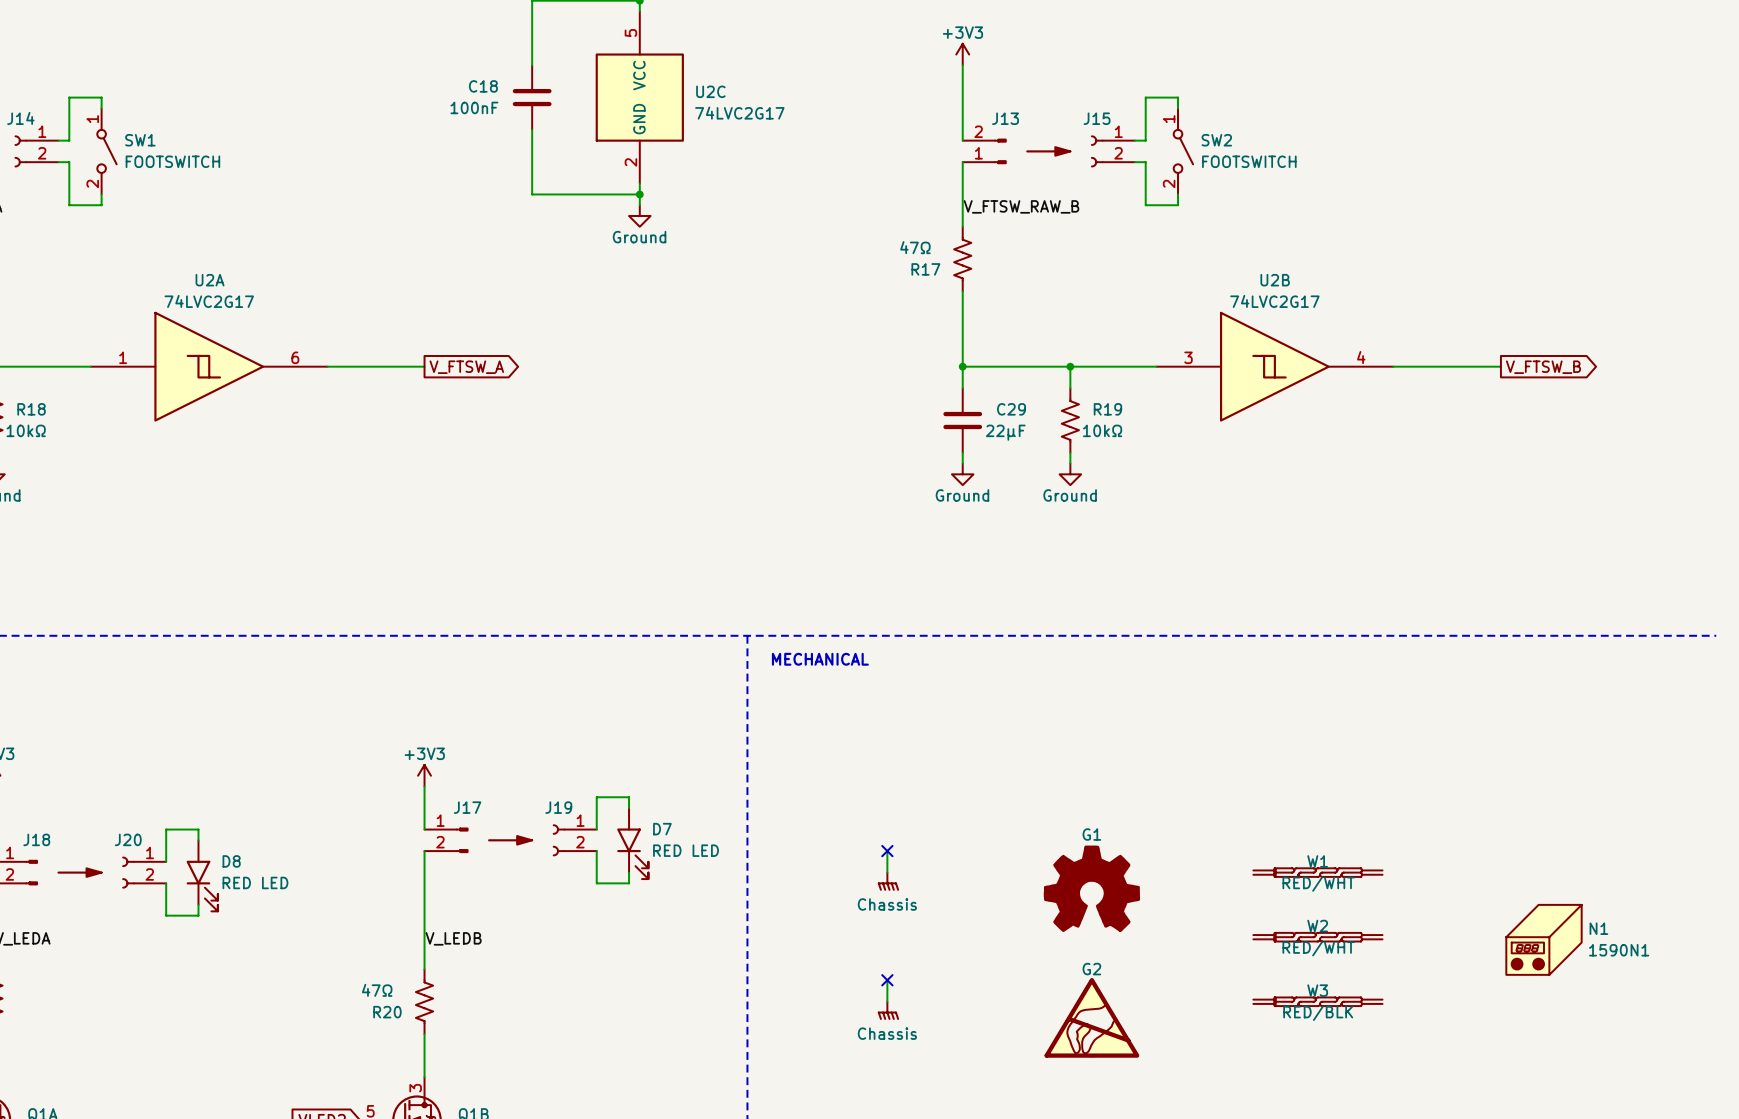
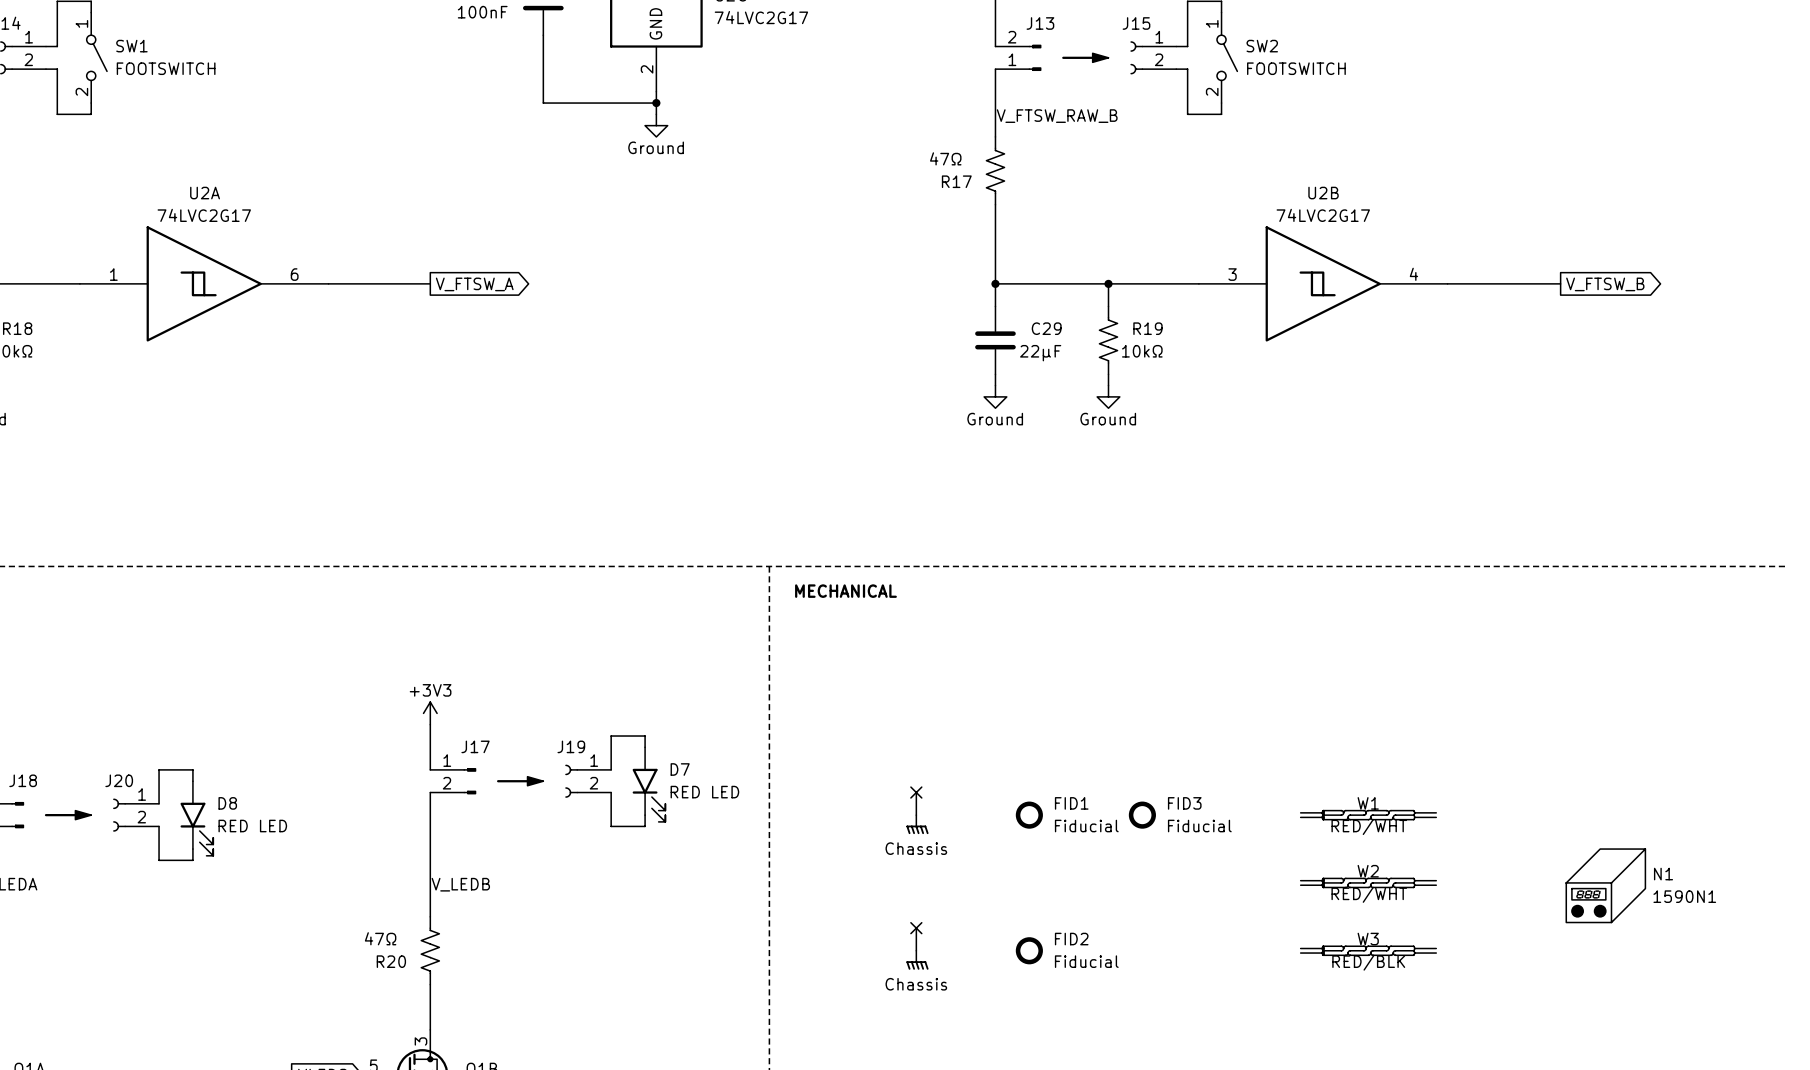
FID1: none -> Fiducial (1029, 815)
FID3: none -> Fiducial (1142, 815)
G1: (1091, 888) -> none
FID2: none -> Fiducial (1029, 950)
G2: (1091, 1017) -> none

